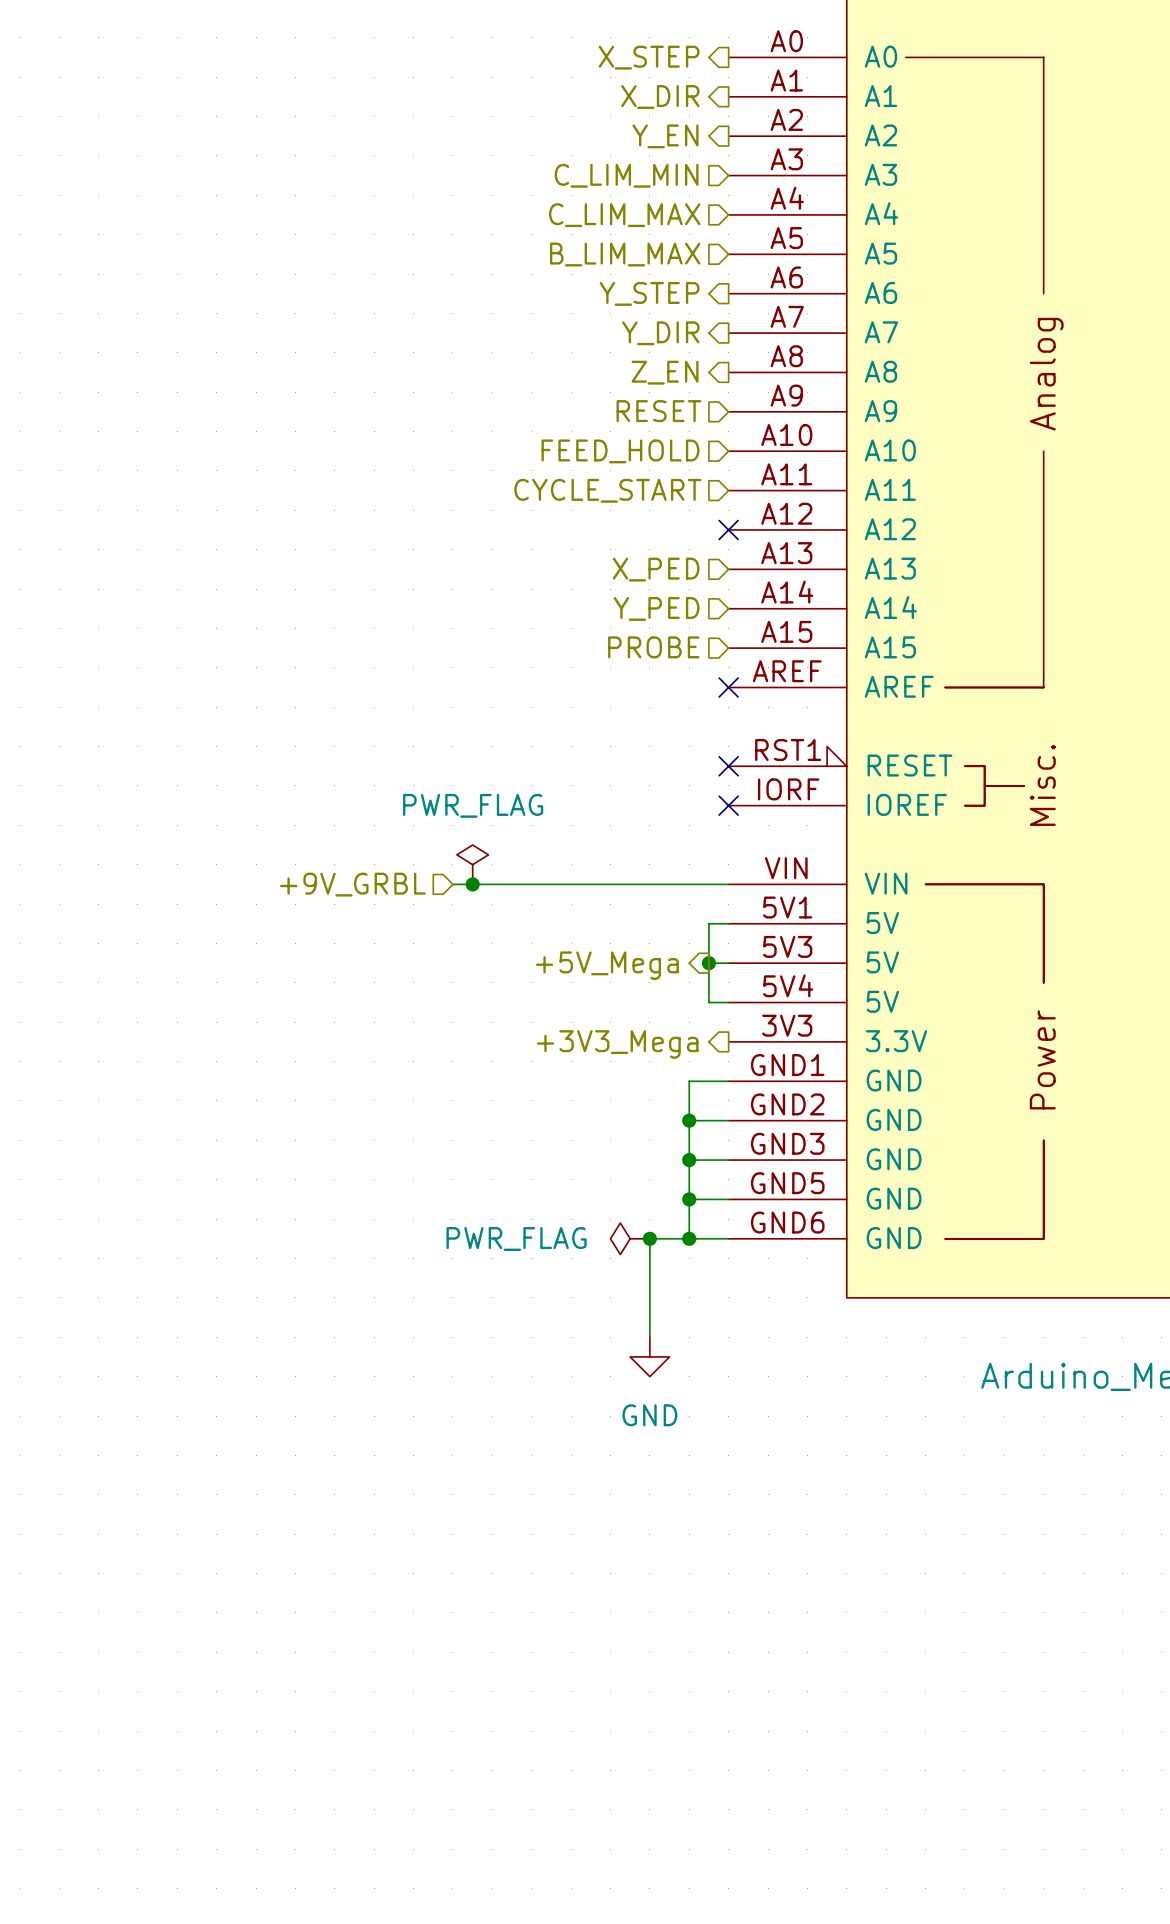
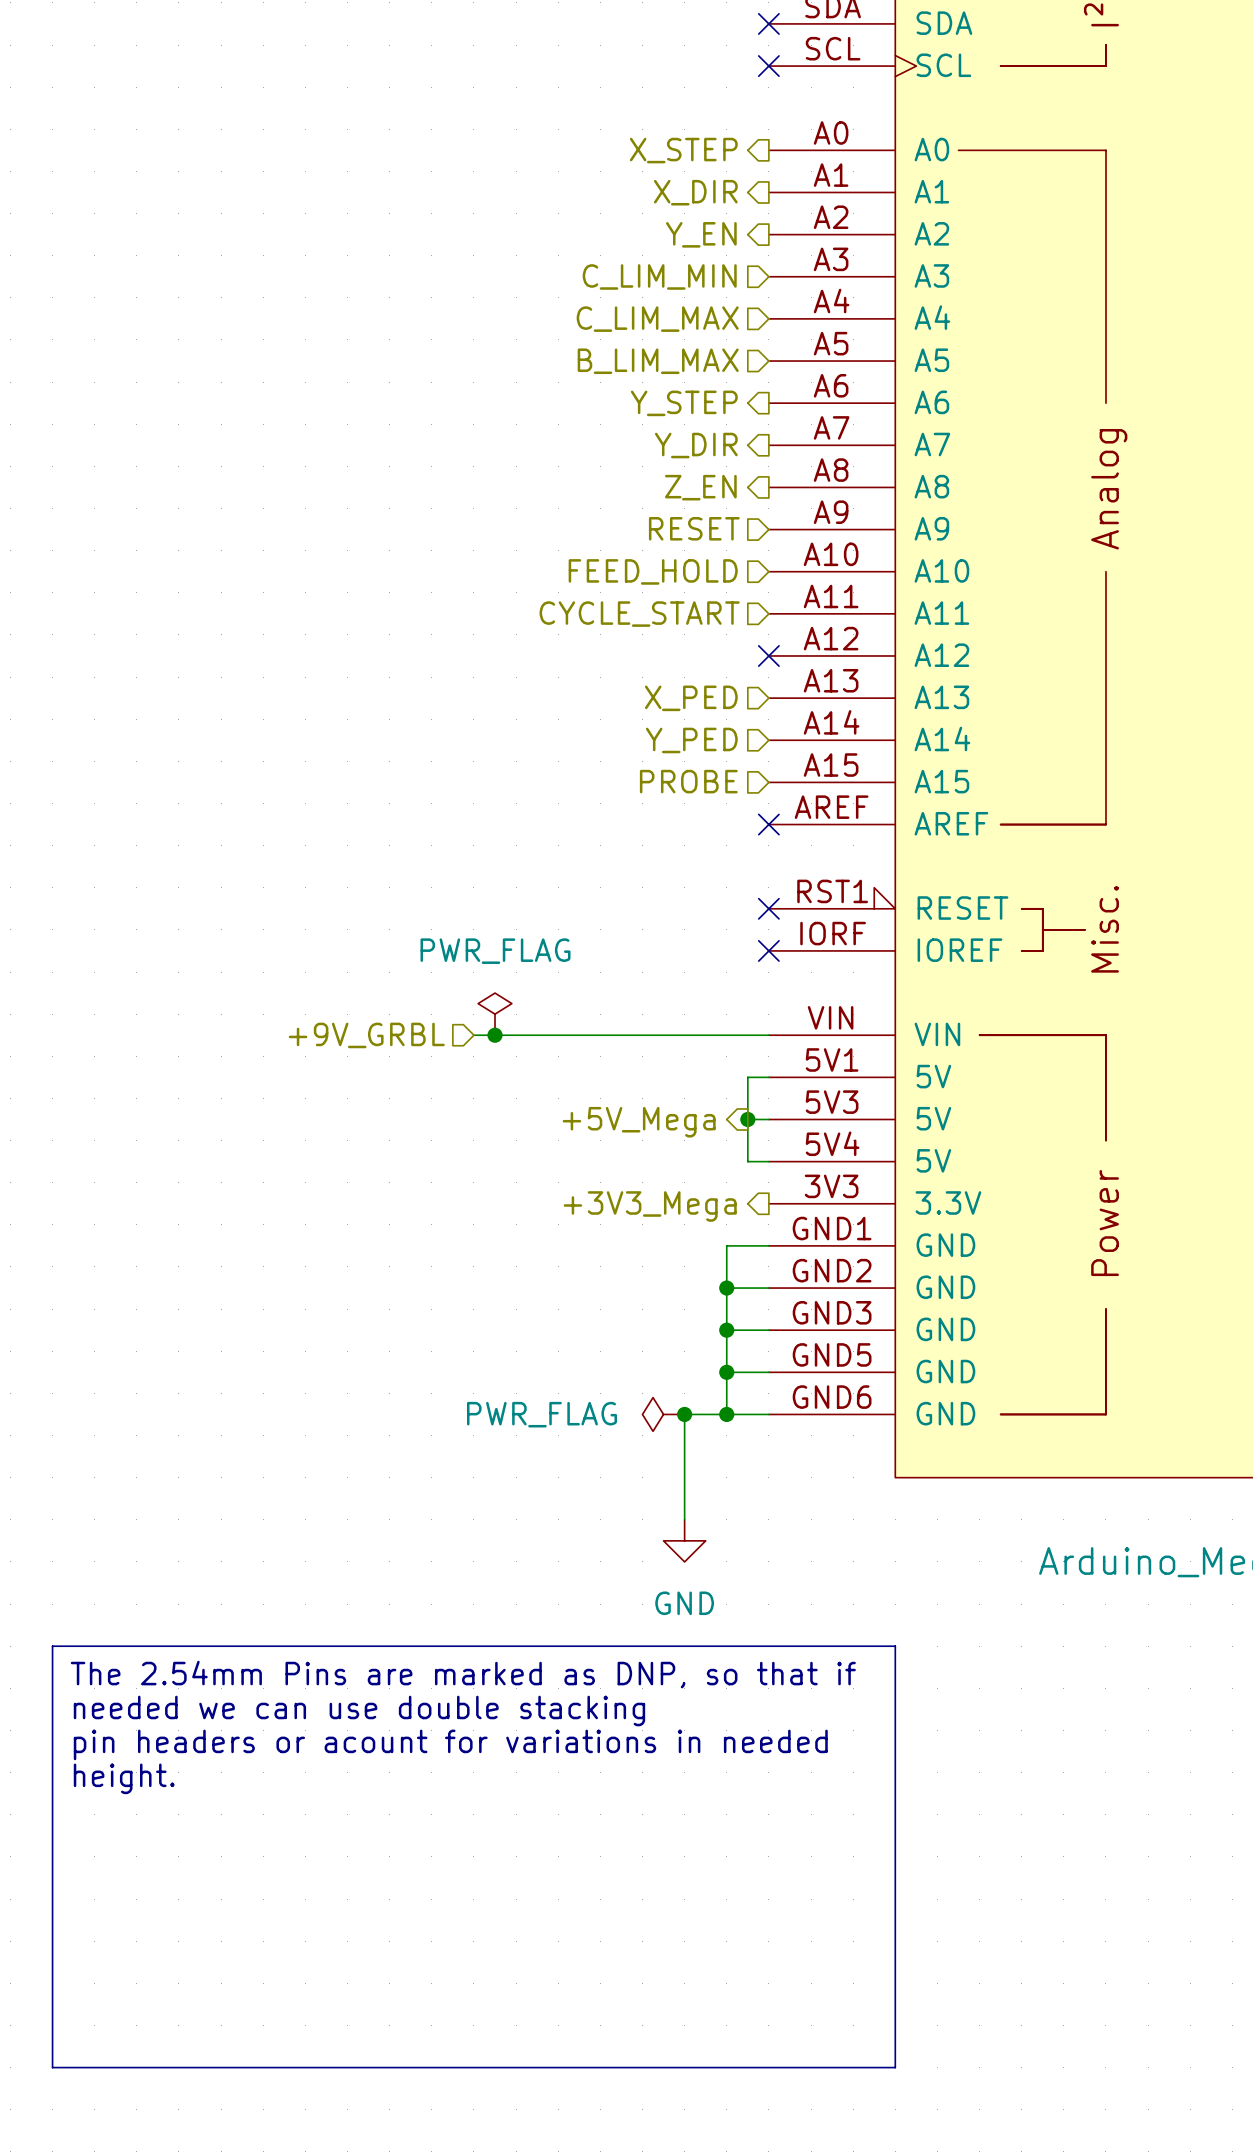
line: none -> (52, 1646) (895, 1646) (895, 2067) (52, 2067) (52, 1646)
text: none -> The 2.54mm Pins are marked as DNP, so that if (463, 1674)
text: none -> needed we can use double stacking (359, 1710)
text: none -> pin headers or acount for variations in needed (450, 1744)
text: none -> height. (124, 1778)

